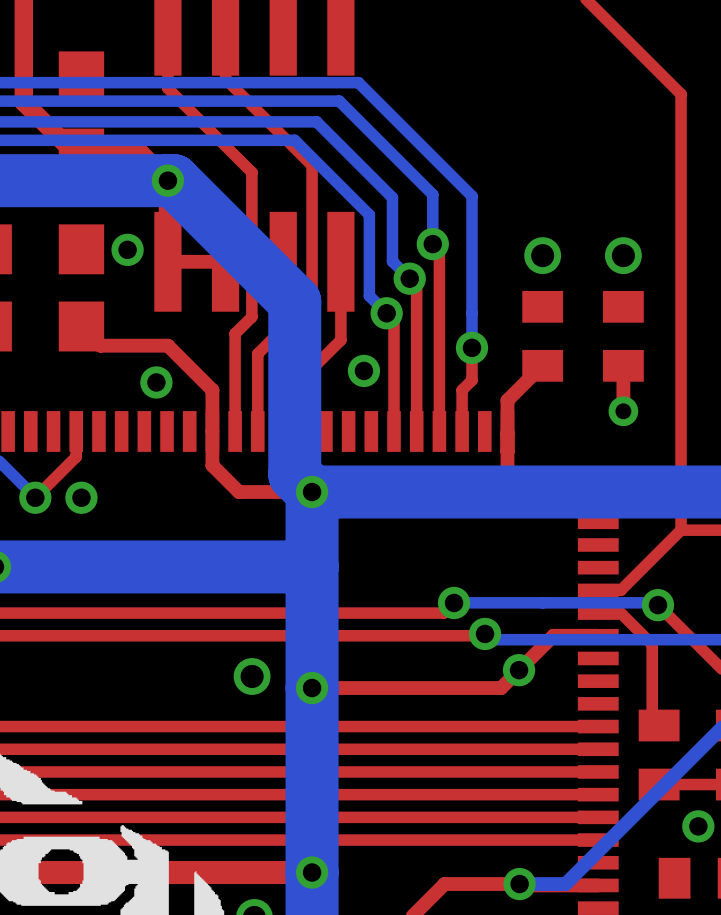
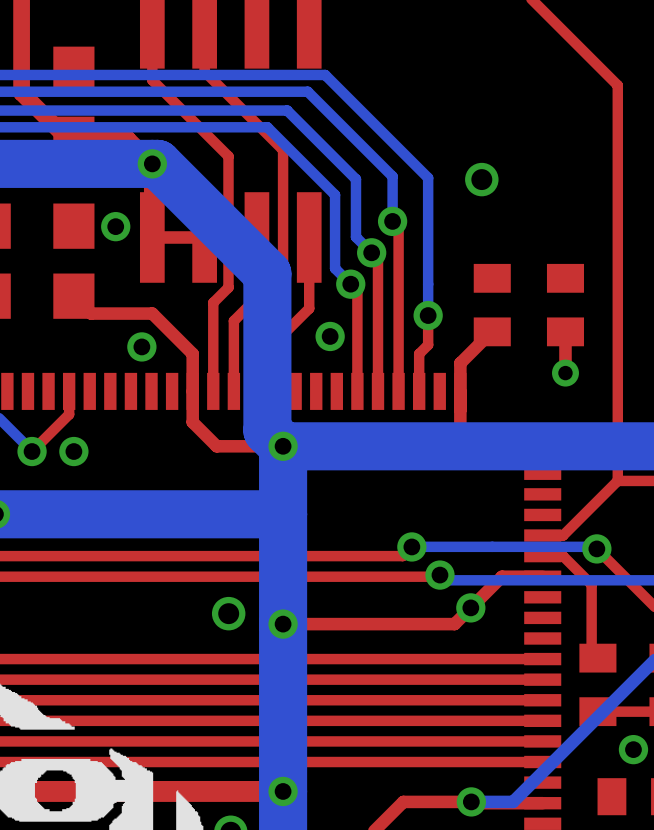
via: none -> (481, 179)
via: (542, 255) -> none
via: (623, 255) -> none

